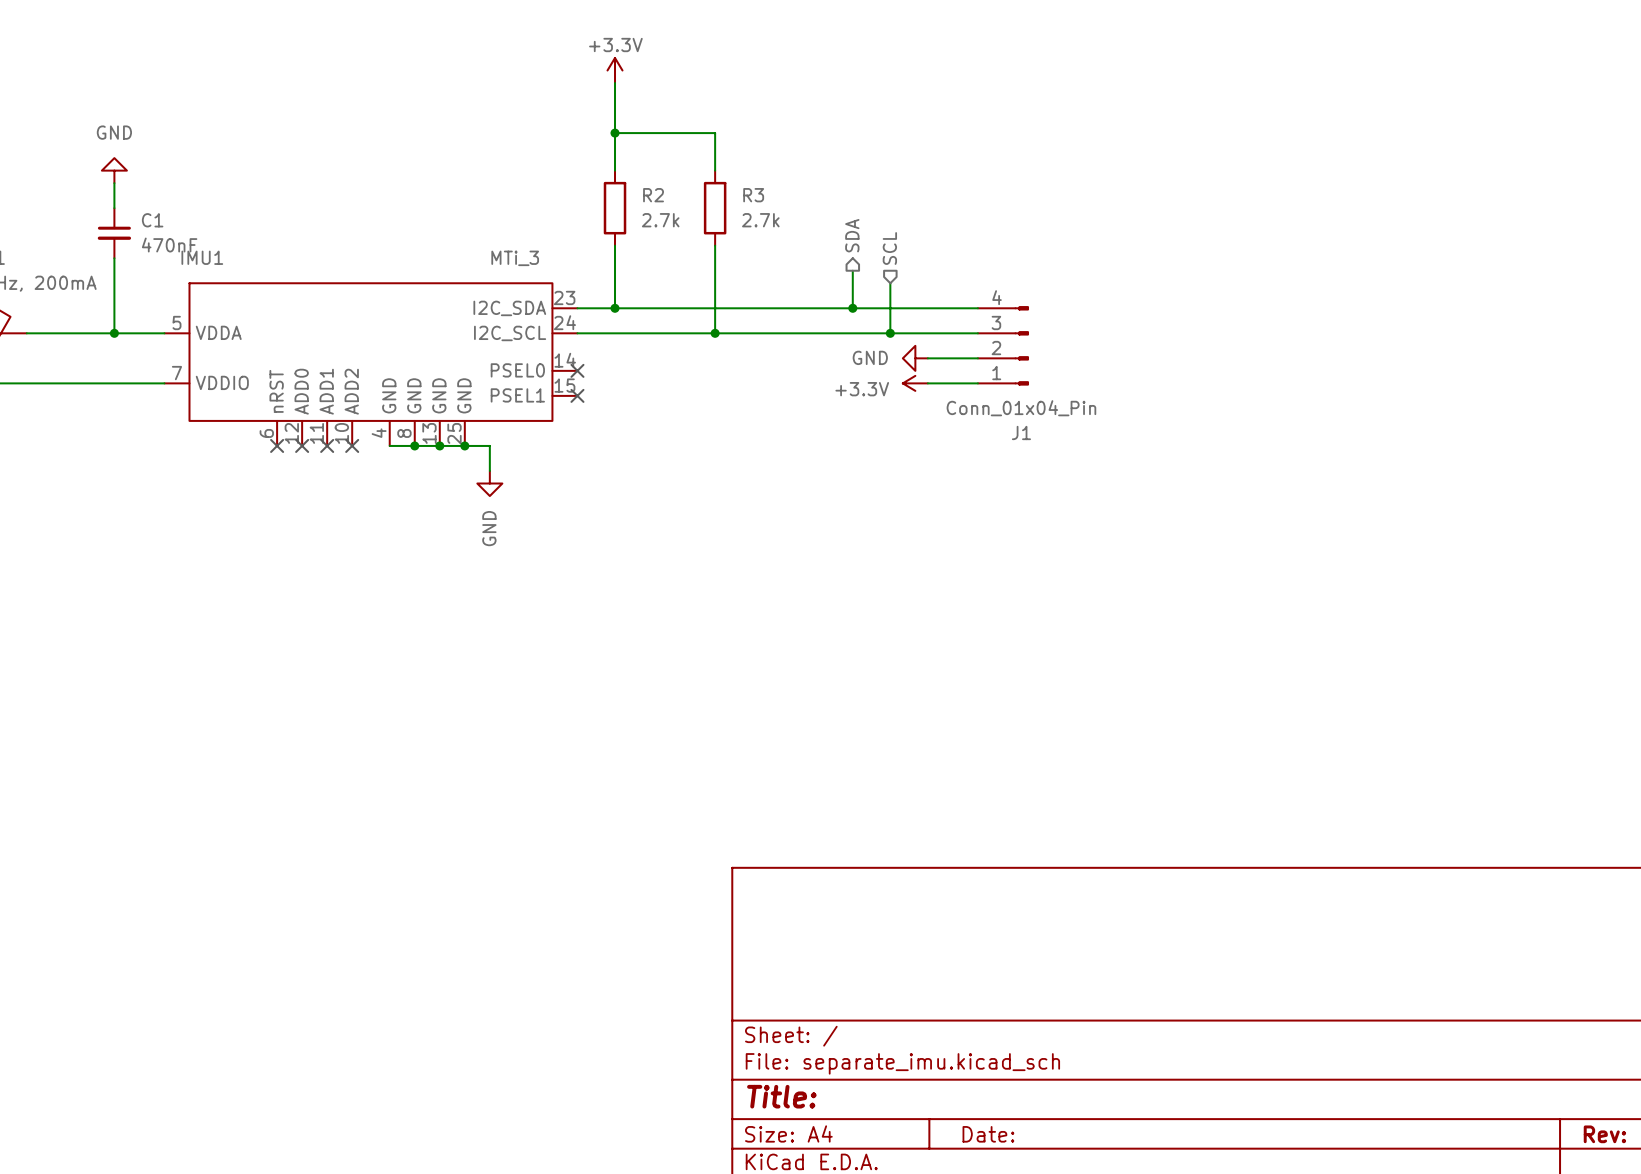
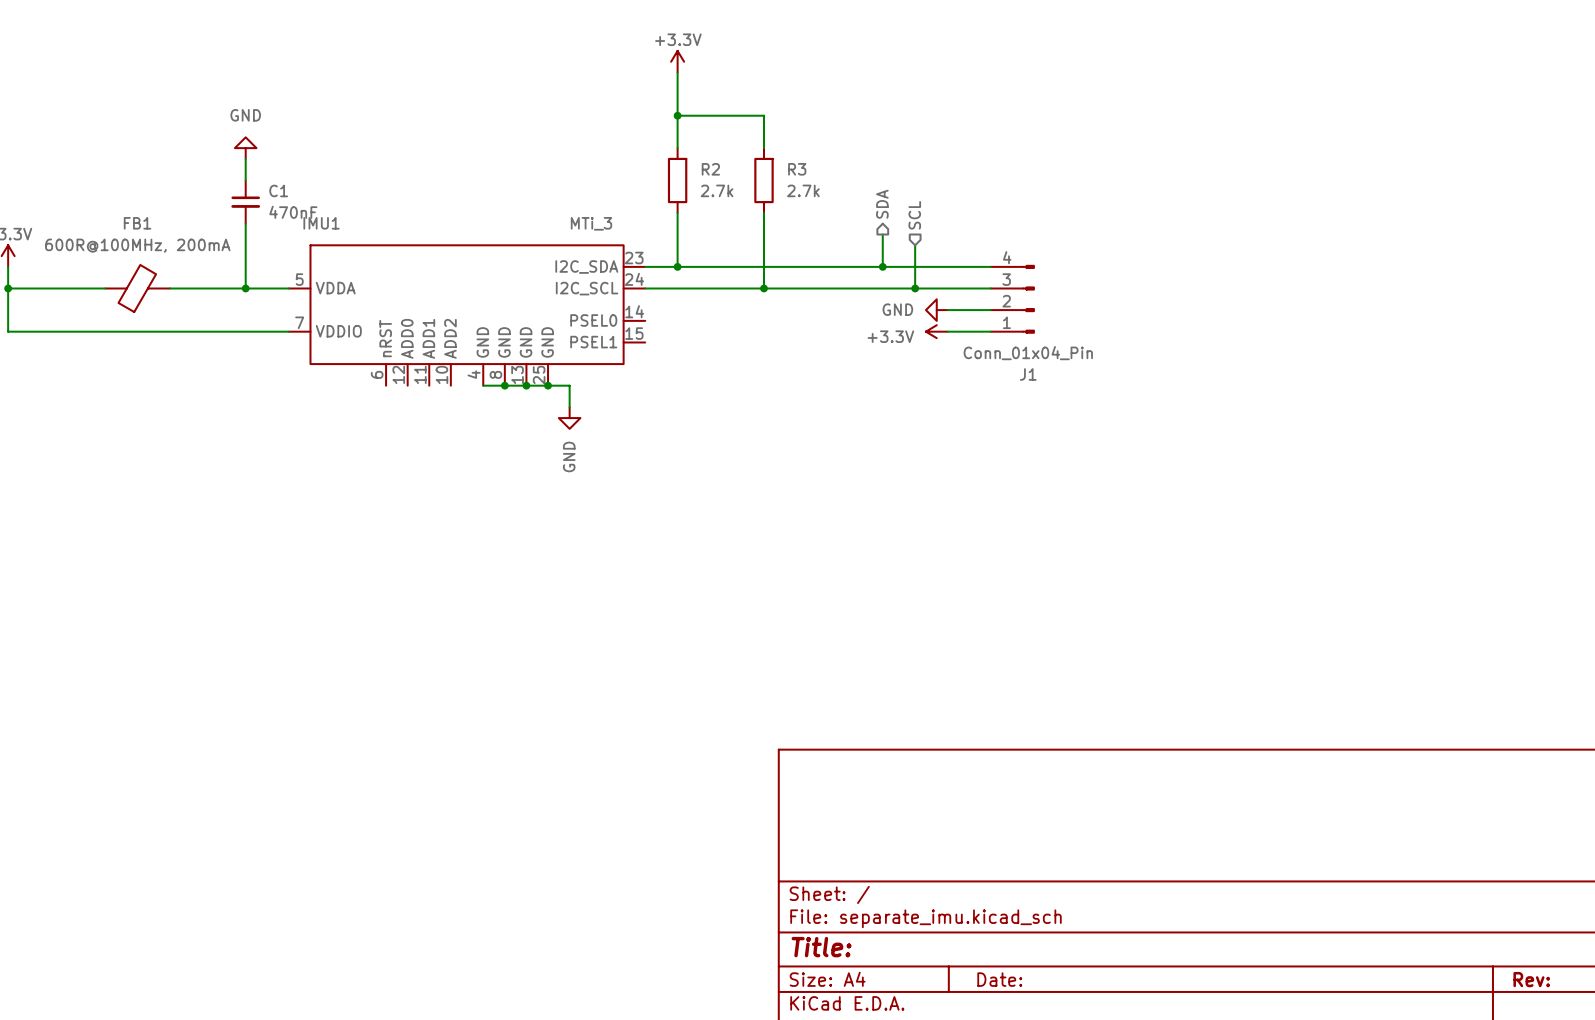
no-connect mark: (577, 370) -> none
no-connect mark: (577, 395) -> none
no-connect mark: (277, 445) -> none
no-connect mark: (302, 445) -> none
no-connect mark: (327, 445) -> none
no-connect mark: (352, 445) -> none

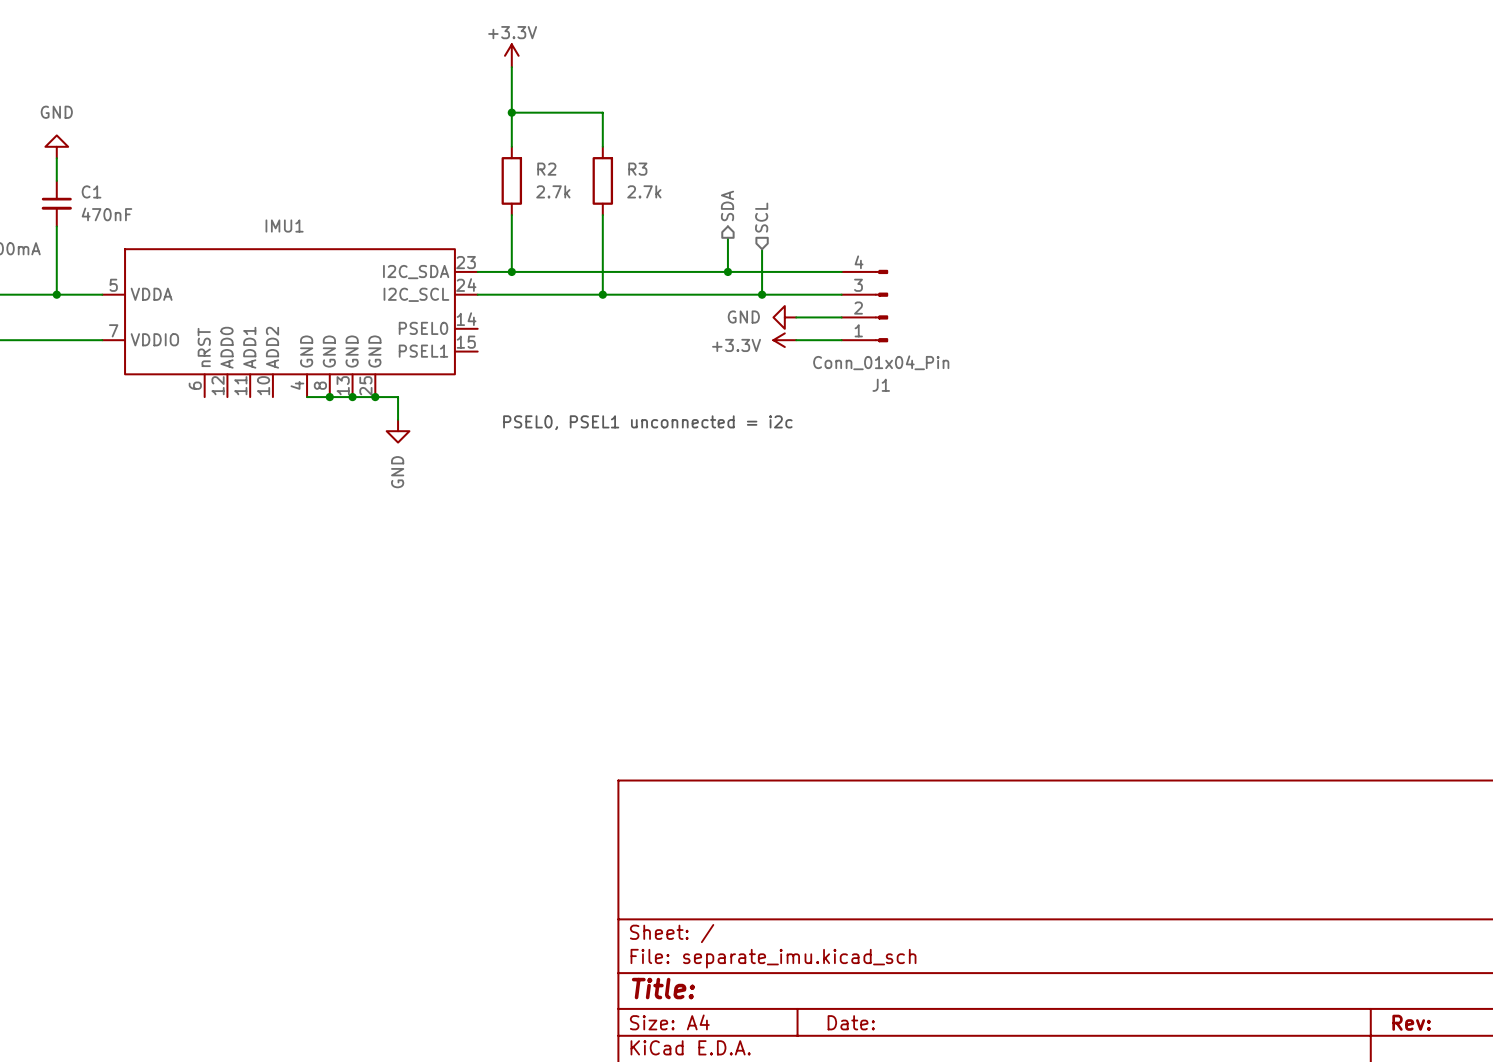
IMU1 name position: IMU1 (321, 223) -> IMU1 (284, 226)
IMU1 value: MTi_3 (591, 223) -> none
text: none -> PSEL0, PSEL1 unconnected = i2c (647, 422)

